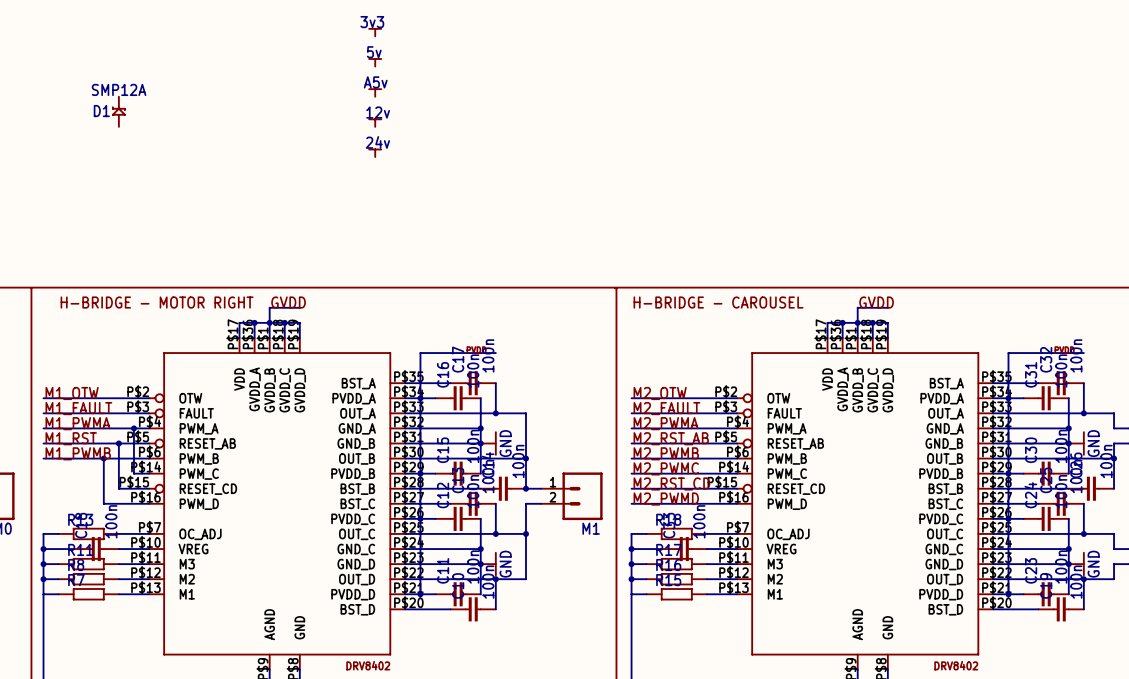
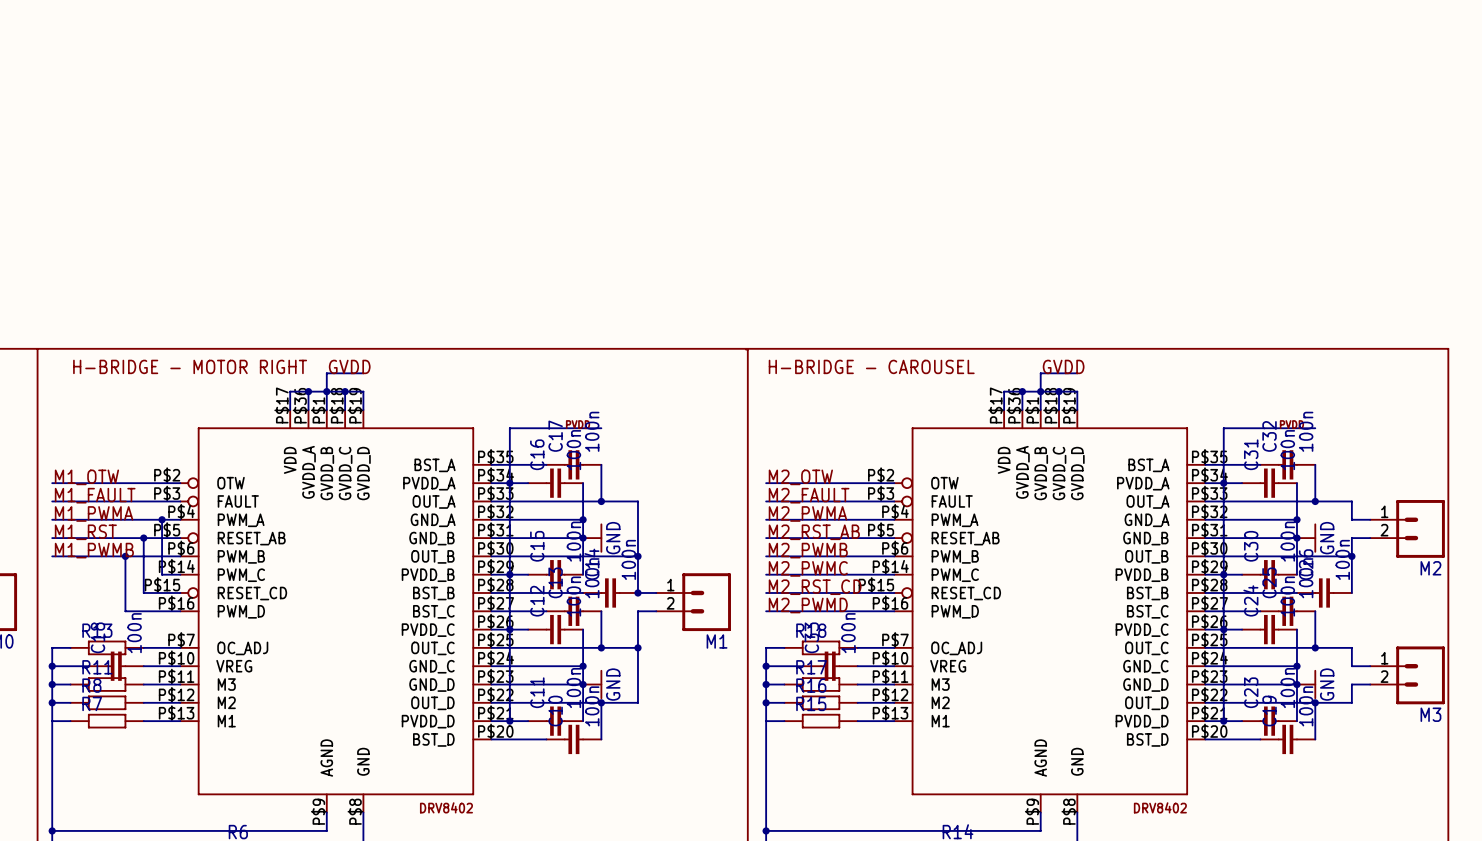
power symbol: (375, 32) -> none
power symbol: (375, 62) -> none
power symbol: (375, 92) -> none
D1: SMP12A (118, 111) -> none
power symbol: (375, 122) -> none
power symbol: (375, 153) -> none

